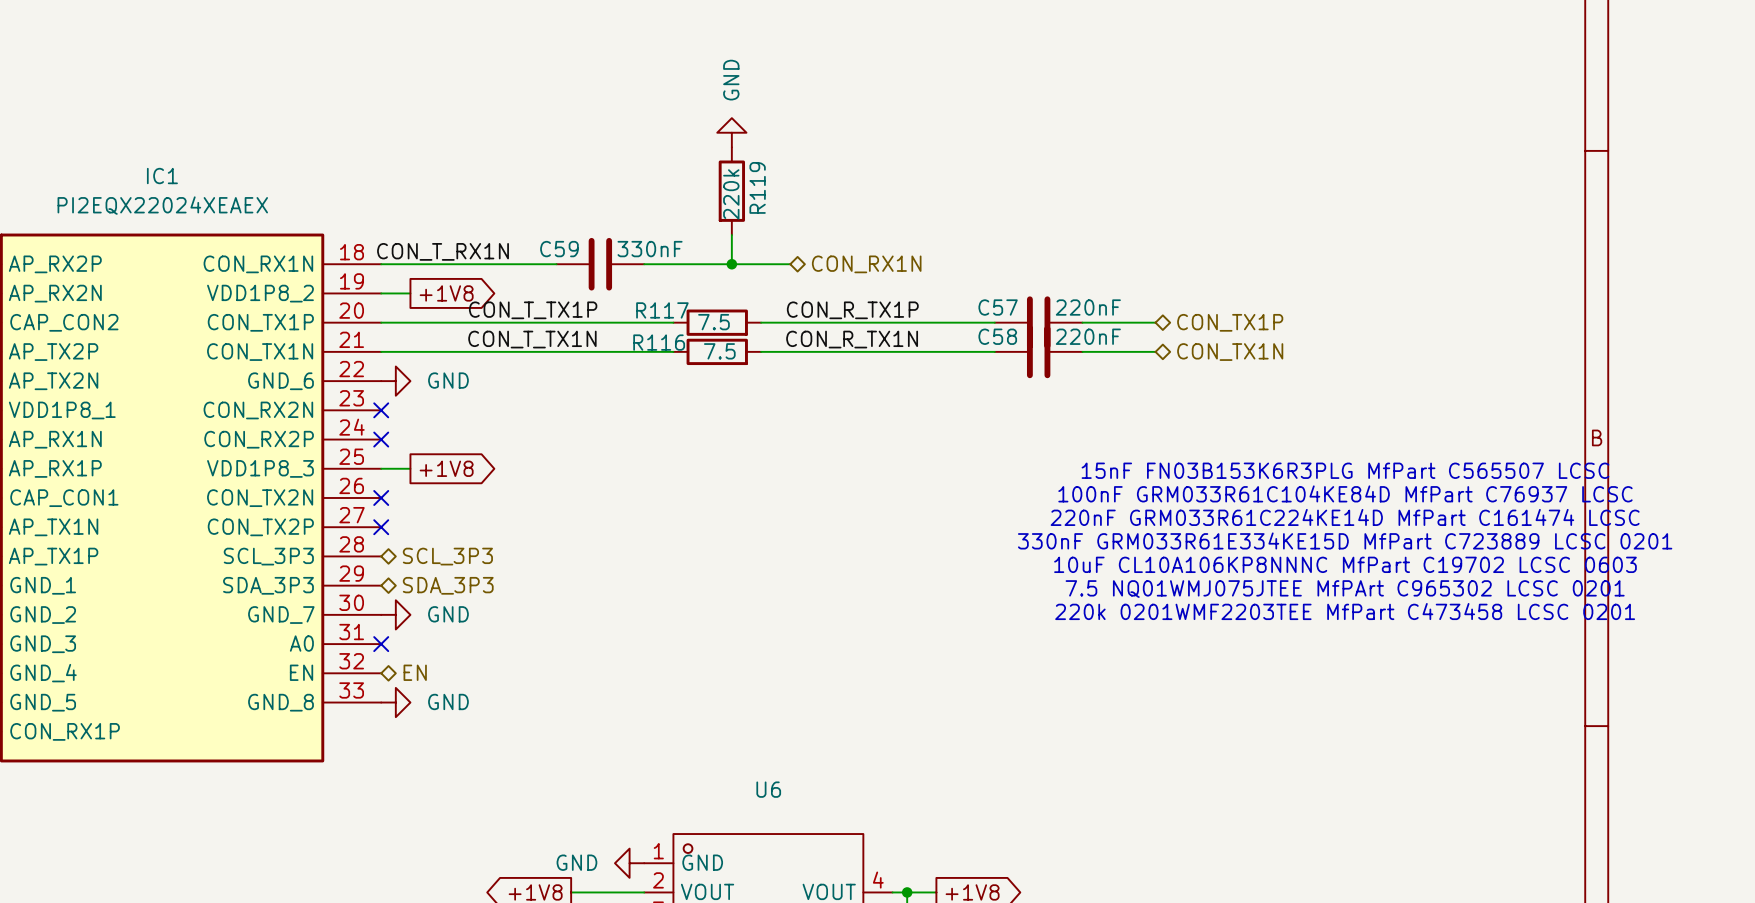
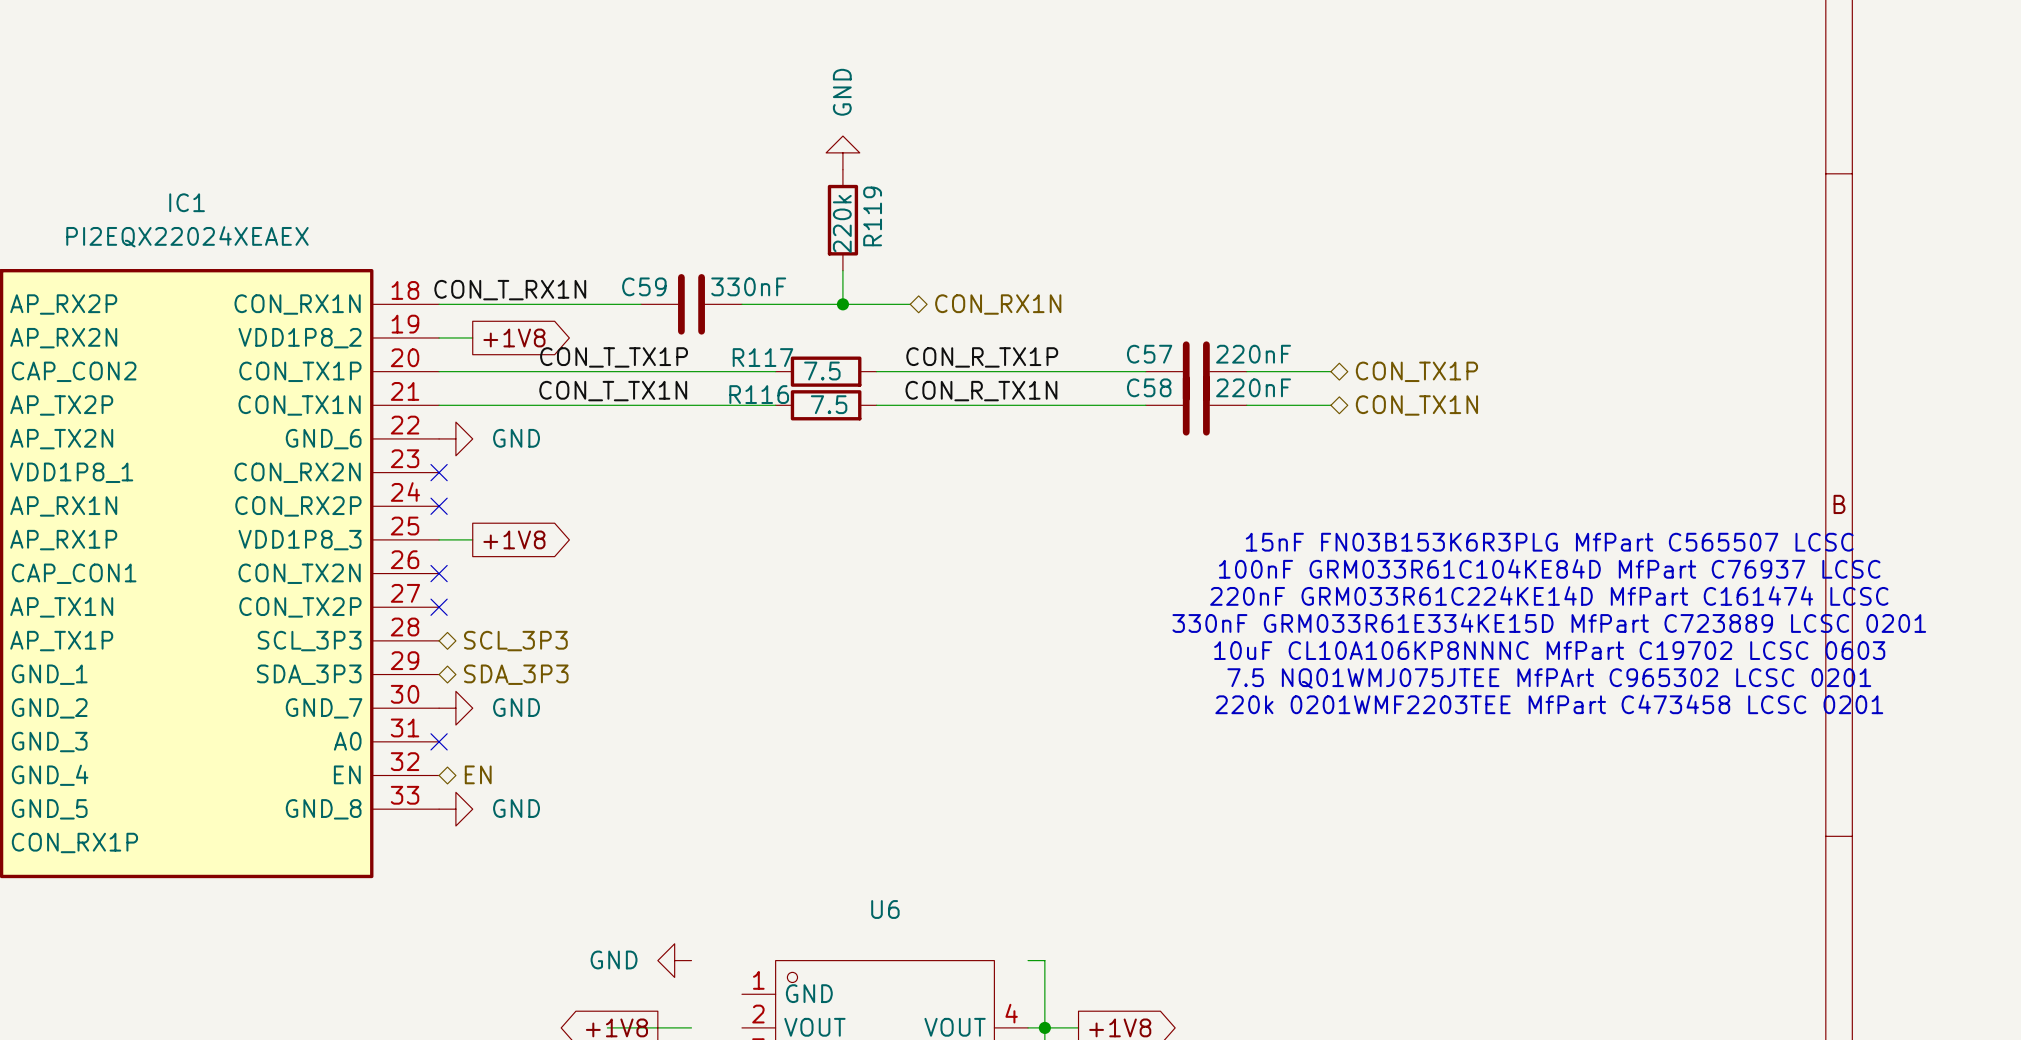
wire: none -> (1028, 960) (1044, 960) (1044, 1027)
power symbol position: GND (629, 863) -> GND (674, 960)
wire: (600, 892) (644, 892) -> (607, 1027) (657, 1027)

